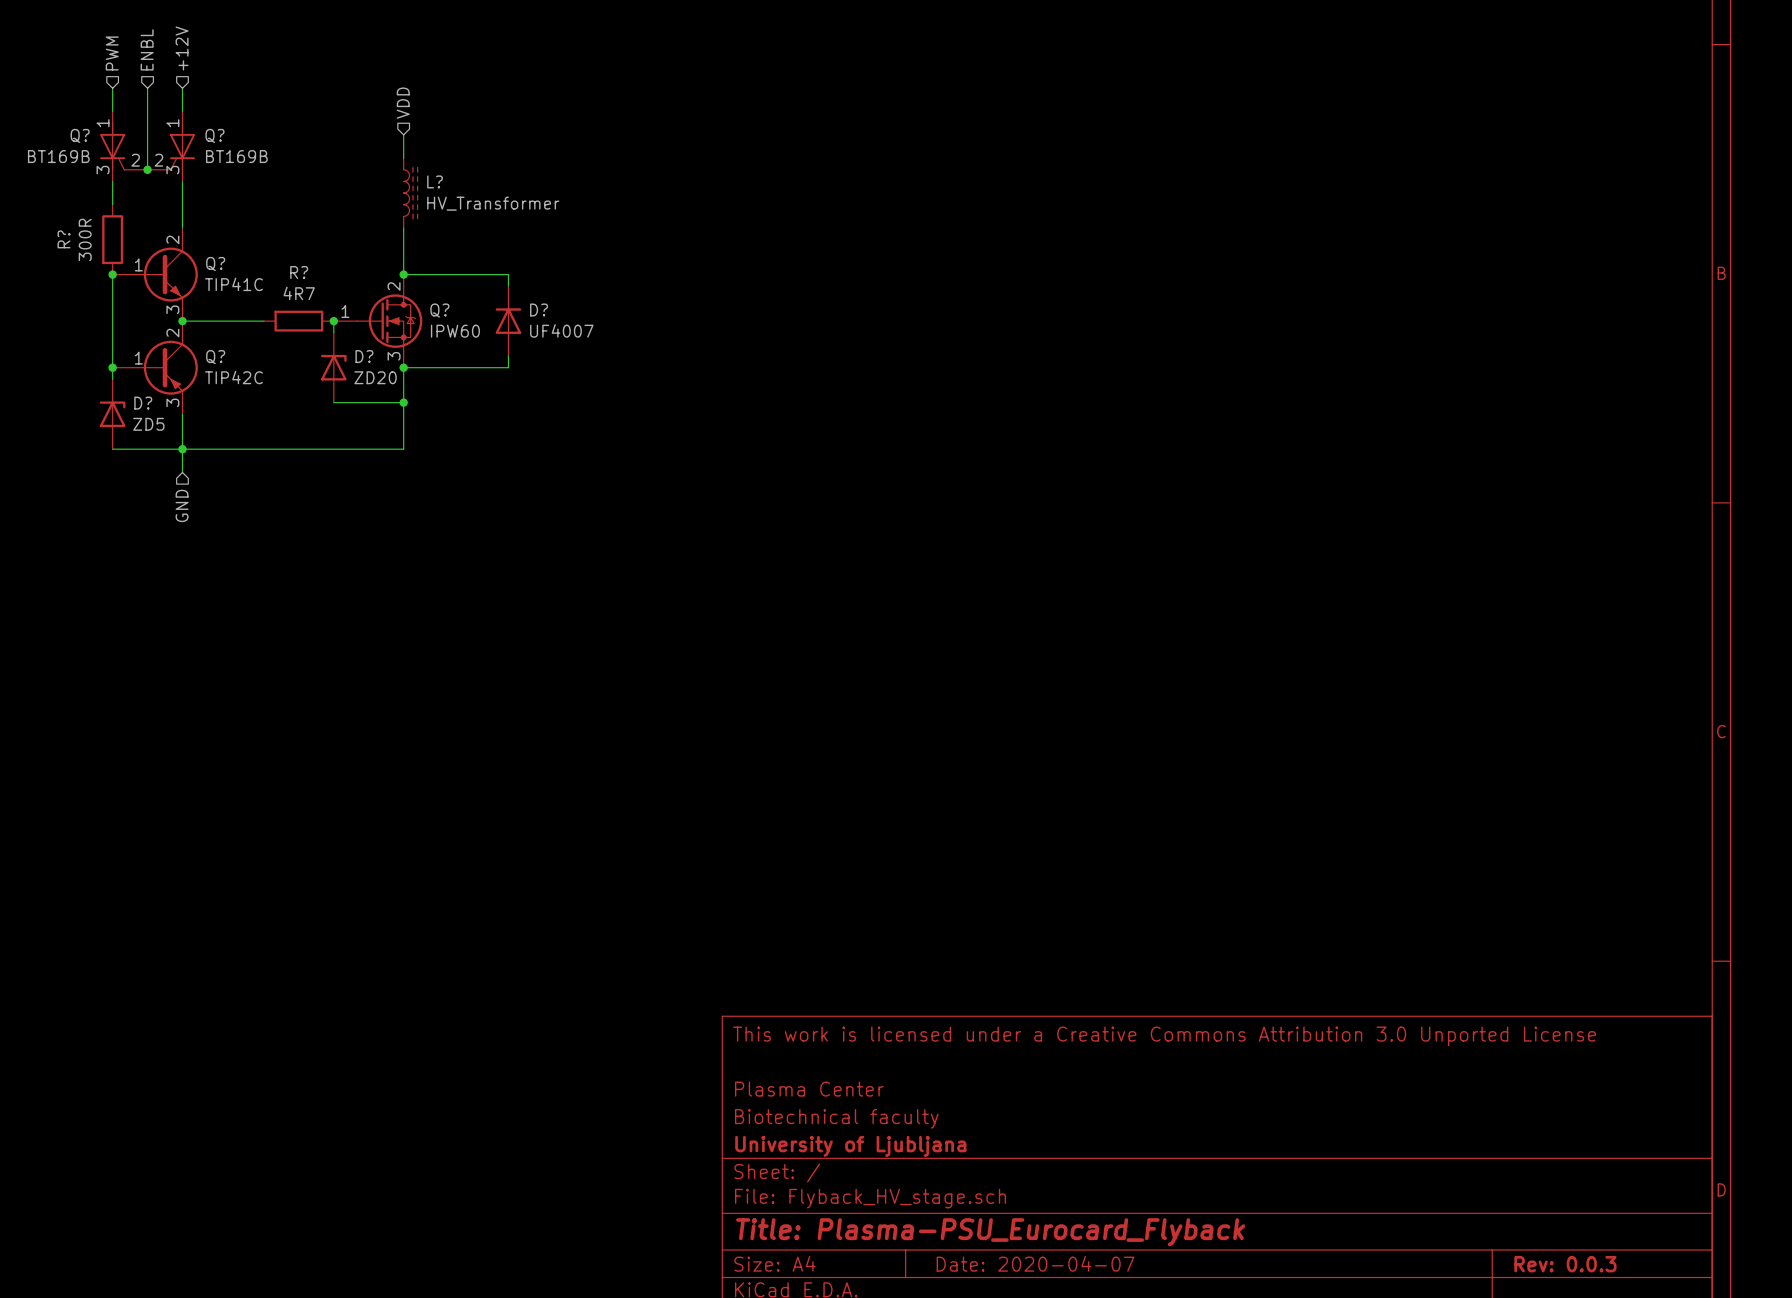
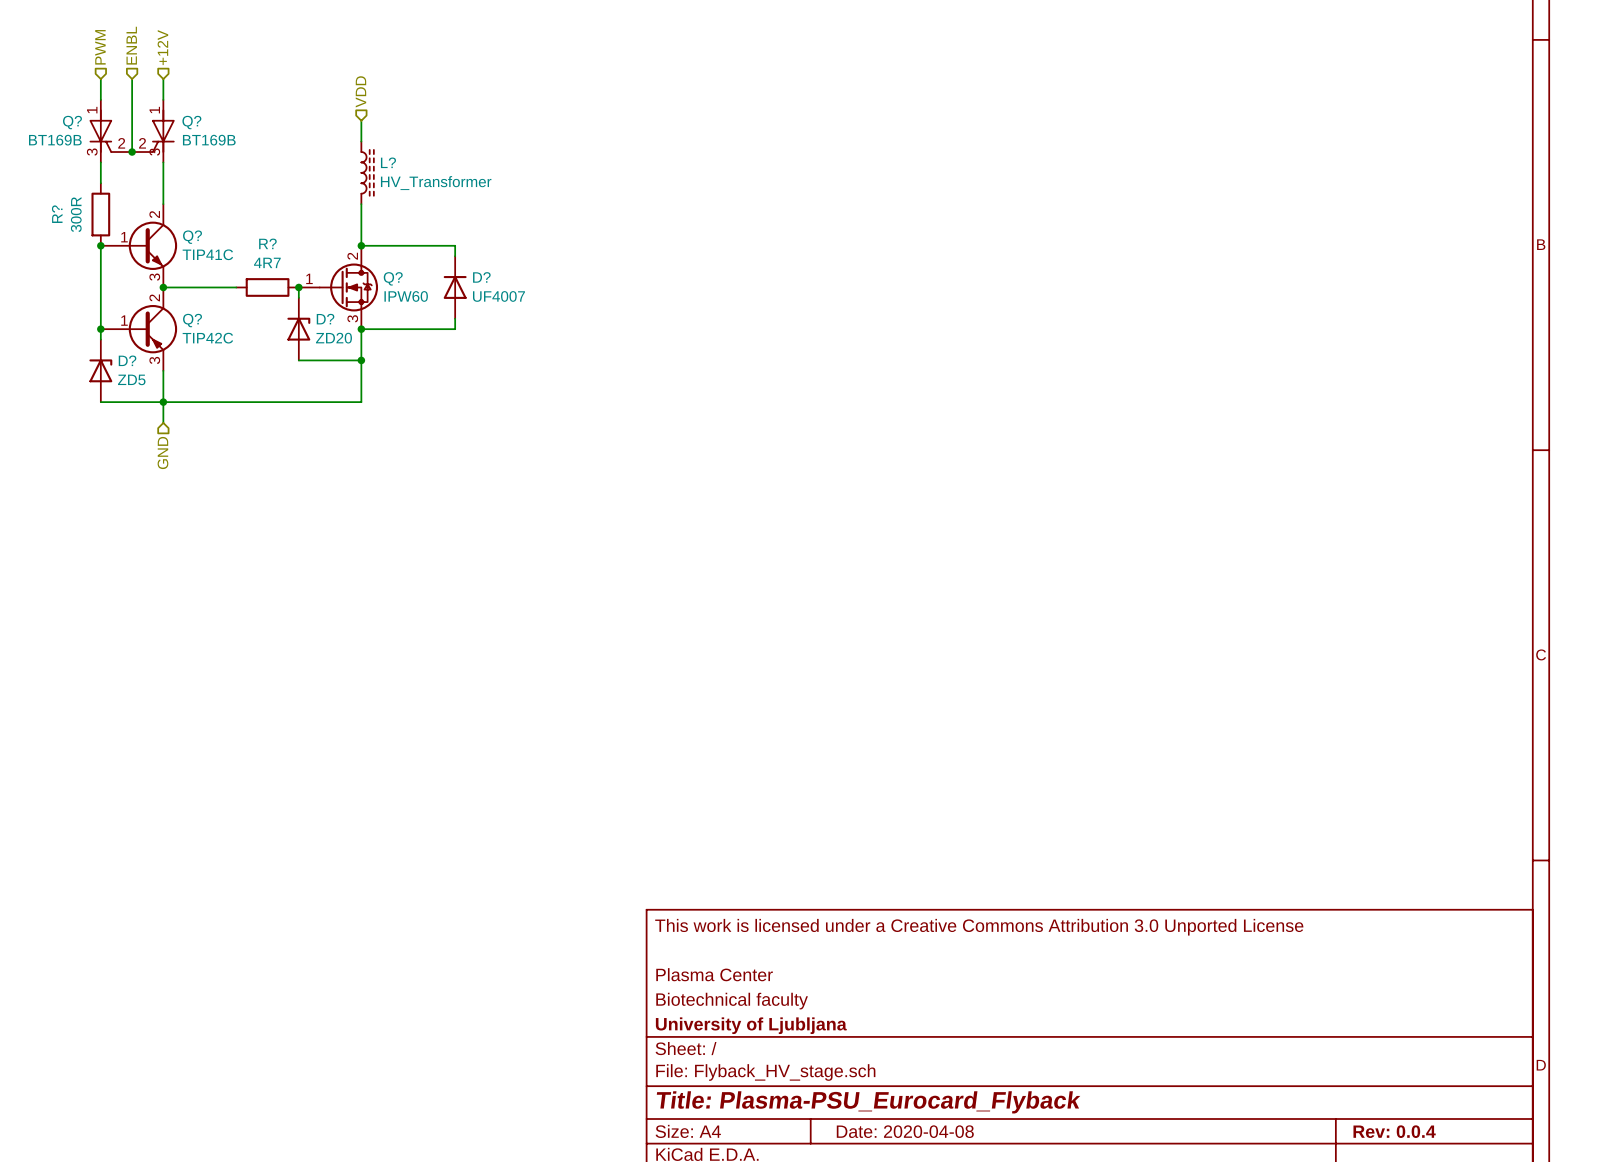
title block: Date: 2020-04-07 (1035, 1263) -> Date: 2020-04-08 (905, 1131)
title block: Rev: 0.0.3 (1565, 1264) -> Rev: 0.0.4 (1394, 1131)

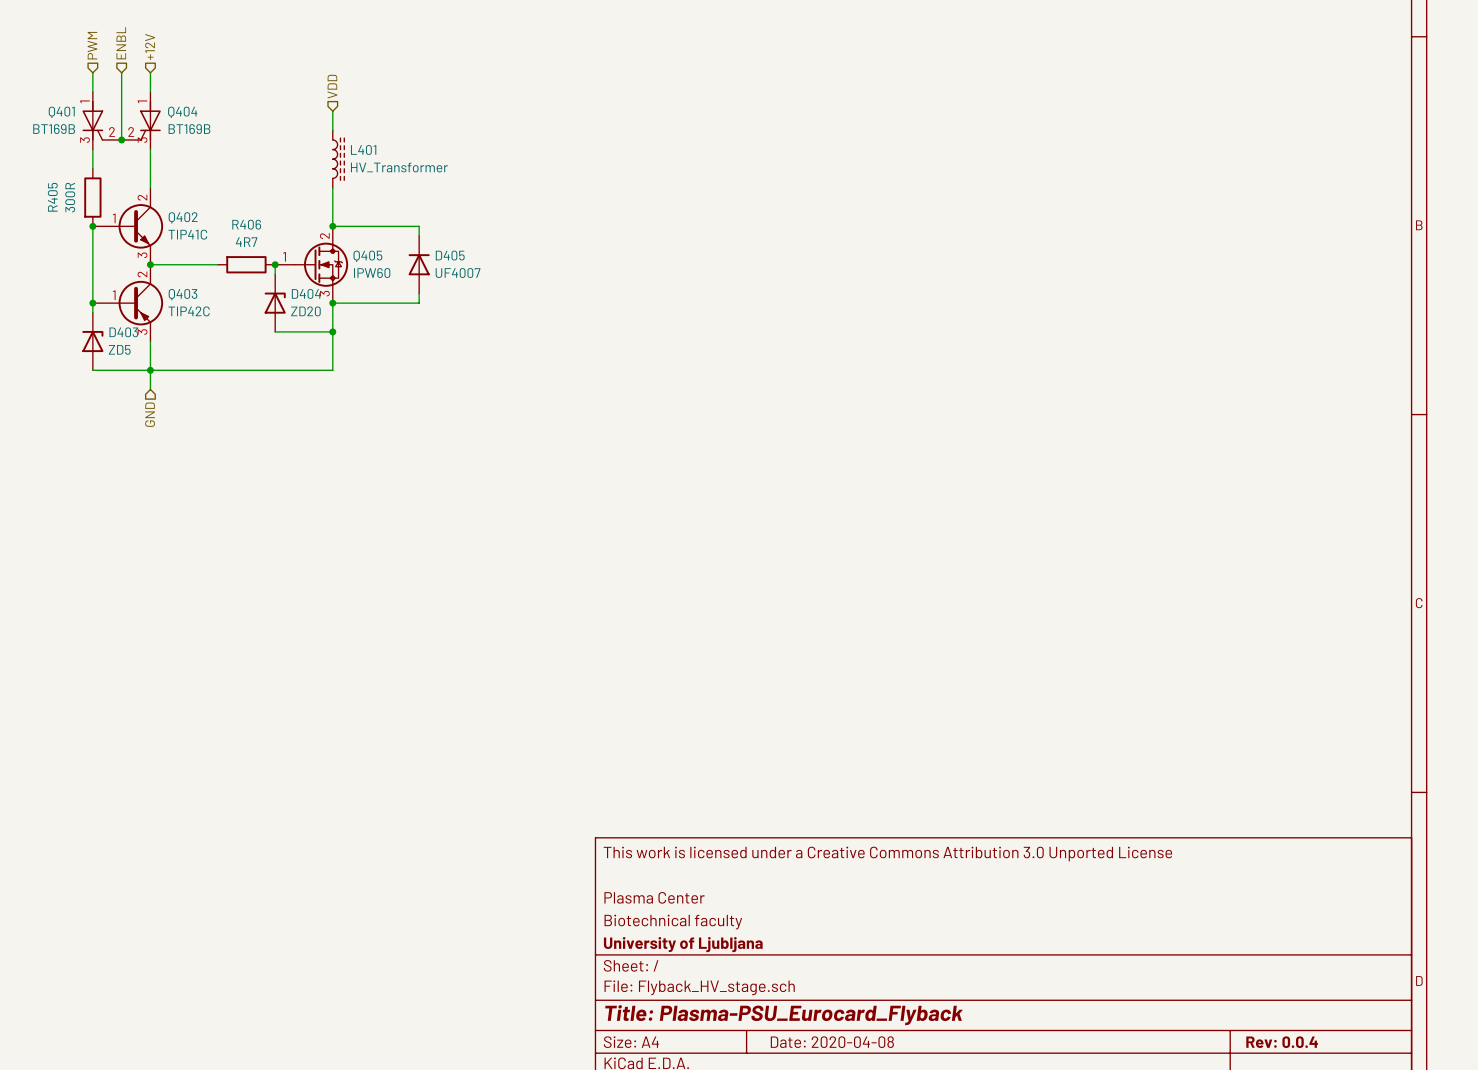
Q? name: Q? (72, 122) -> Q401 (61, 112)
Q? name: Q? (191, 122) -> Q404 (182, 112)
L? name: L? (388, 162) -> L401 (363, 149)
R? name: R? (57, 214) -> R405 (52, 197)
Q? name: Q? (192, 237) -> Q402 (183, 217)
R? name: R? (267, 243) -> R406 (246, 224)
D? name: D? (481, 277) -> D405 (450, 255)
Q? name: Q? (393, 278) -> Q405 (367, 256)
D? name: D? (325, 319) -> D404 (306, 293)
Q? name: Q? (192, 320) -> Q403 (182, 294)
D? name: D? (127, 360) -> D403 (123, 332)

